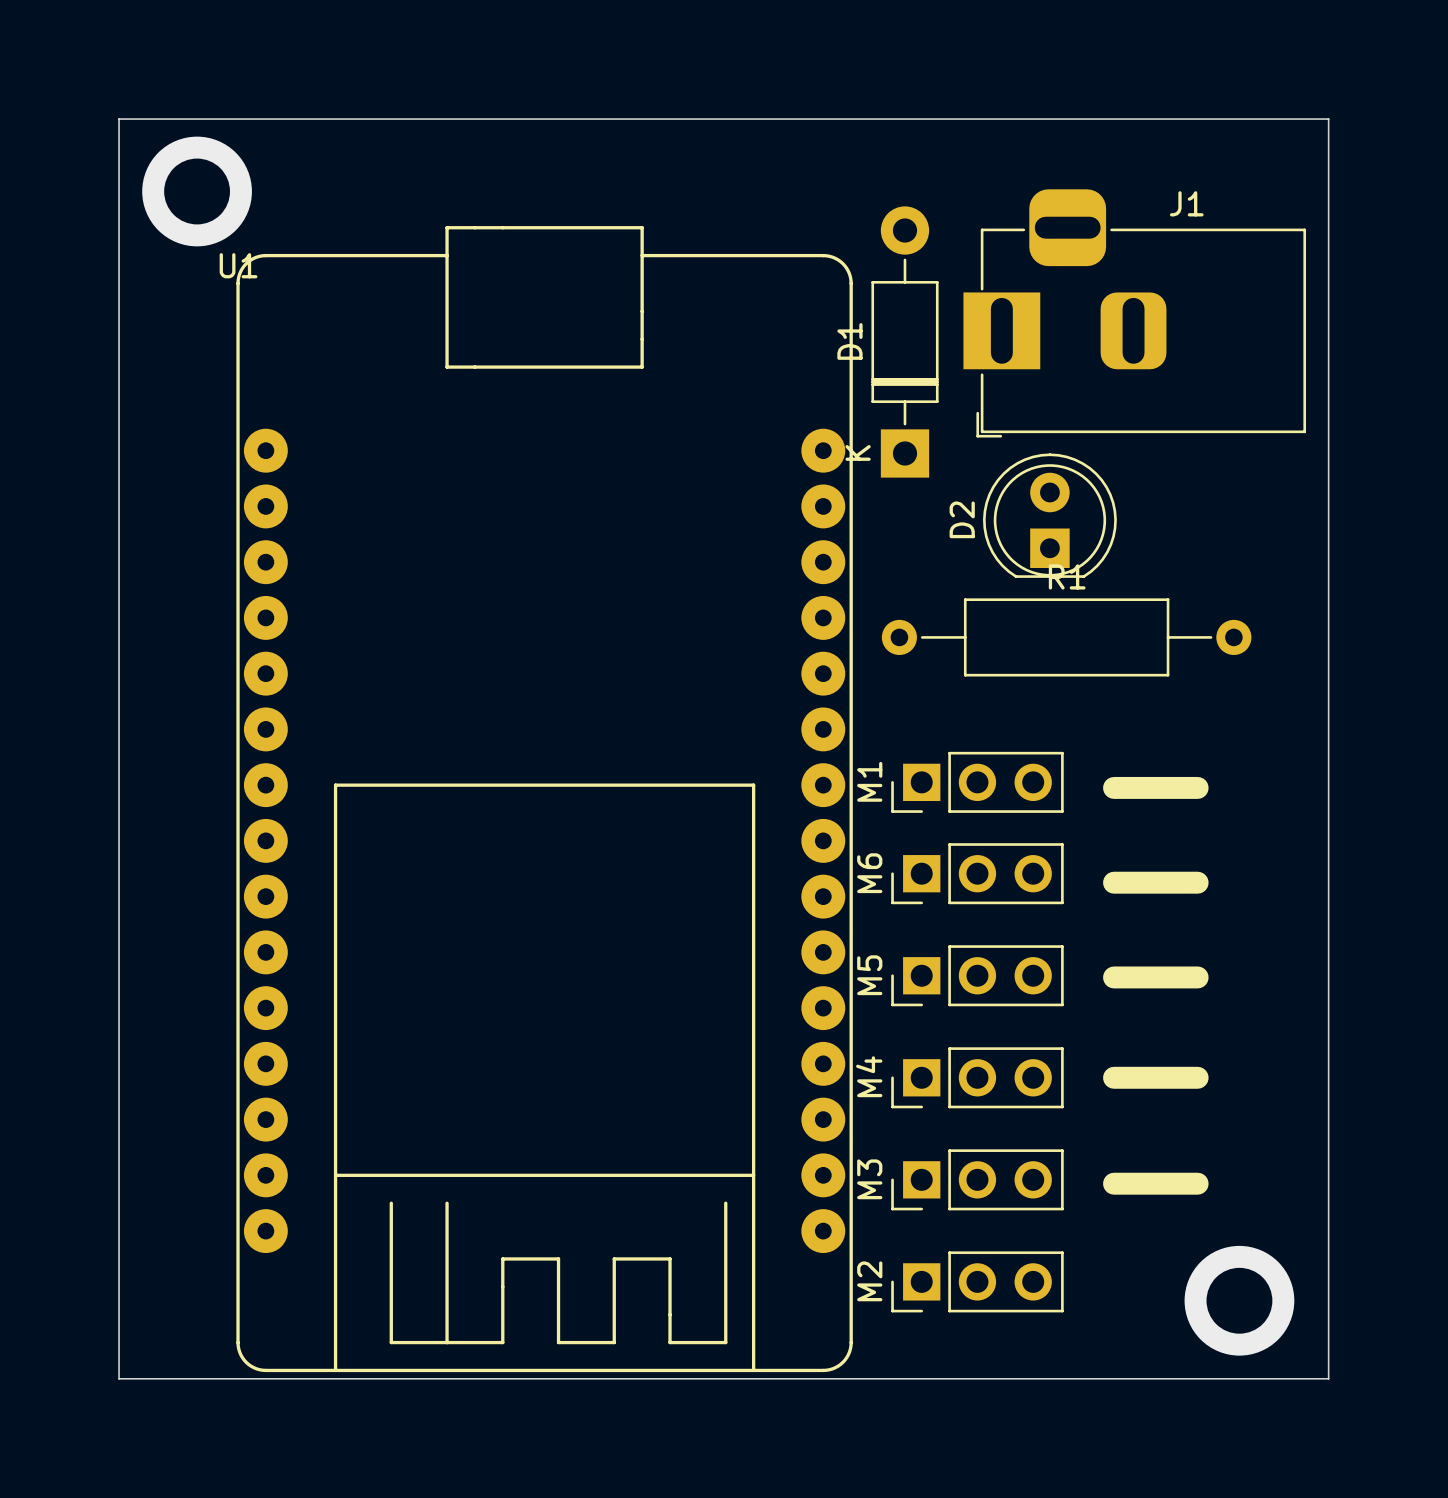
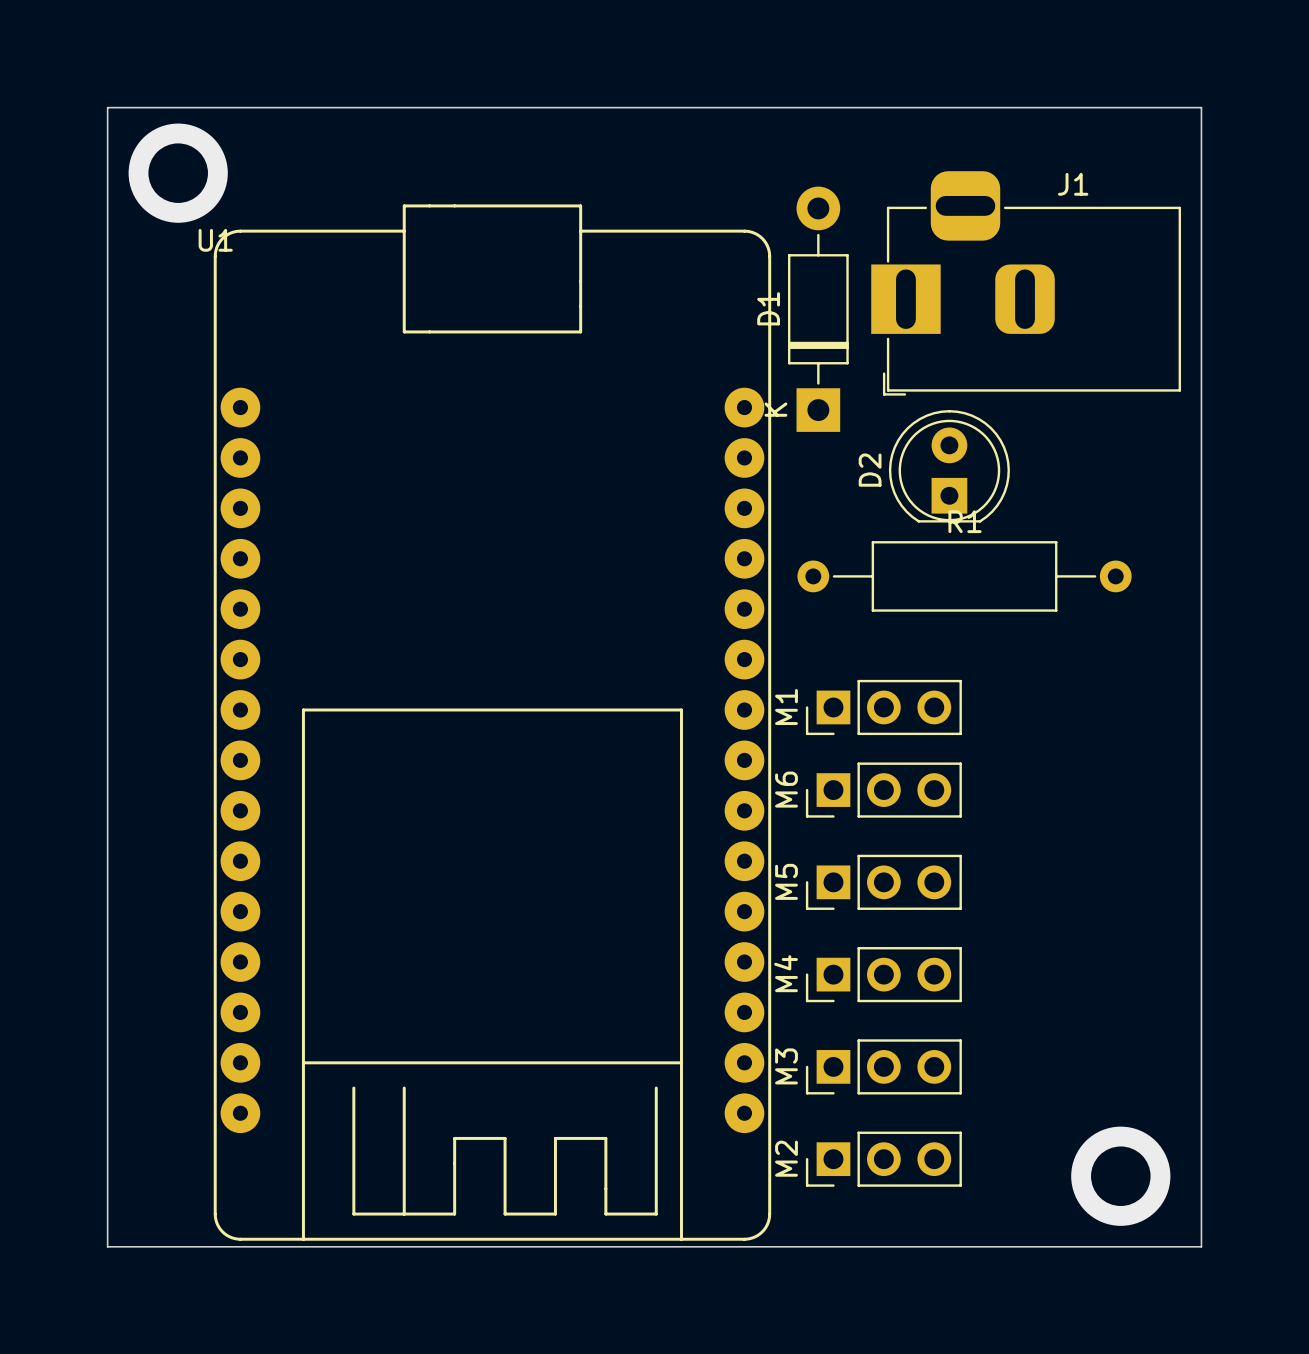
line: (1114, 787) (1197, 787) -> none
line: (1114, 882) (1197, 882) -> none
line: (1114, 977) (1197, 977) -> none
line: (1114, 1077) (1197, 1077) -> none
line: (1114, 1183) (1197, 1183) -> none

